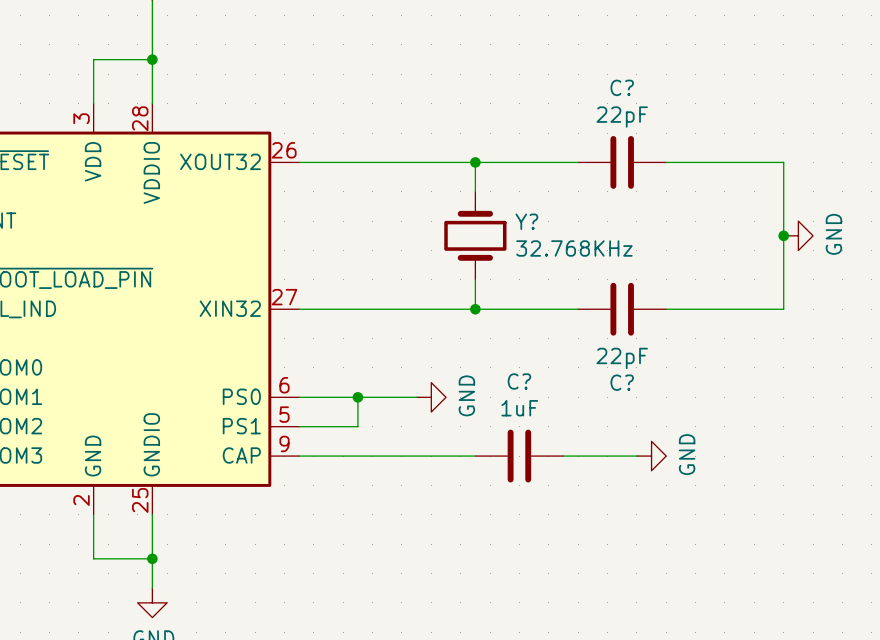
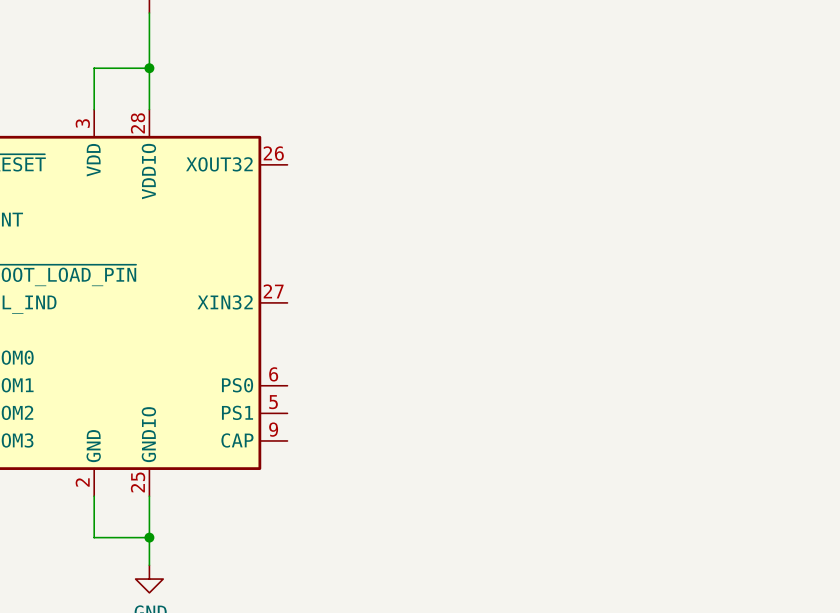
wire: (299, 162) (578, 162) -> none
wire: (475, 162) (475, 191) -> none
junction: (475, 162) -> none
C?: 22pF (622, 162) -> none
wire: (666, 162) (783, 162) (783, 309) (666, 309) -> none
Y?: 32.768KHz (475, 235) -> none
junction: (783, 235) -> none
power symbol: GND (798, 235) -> none
wire: (475, 279) (475, 309) -> none
wire: (299, 309) (578, 309) -> none
junction: (475, 309) -> none
C?: 22pF (622, 309) -> none
wire: (299, 397) (416, 397) -> none
wire: (357, 397) (357, 426) (299, 426) -> none
junction: (357, 397) -> none
power symbol: GND (431, 397) -> none
wire: (299, 456) (475, 456) -> none
C?: 1uF (519, 456) -> none
wire: (563, 456) (636, 456) -> none
power symbol: GND (651, 456) -> none

